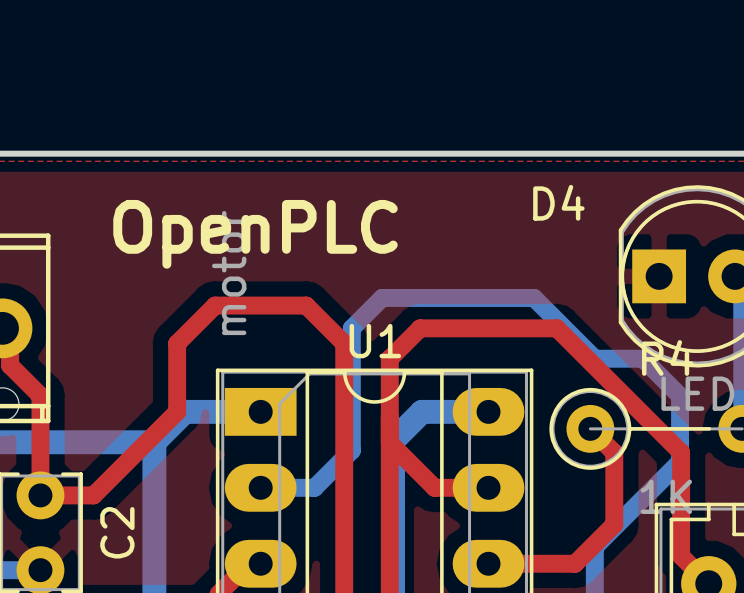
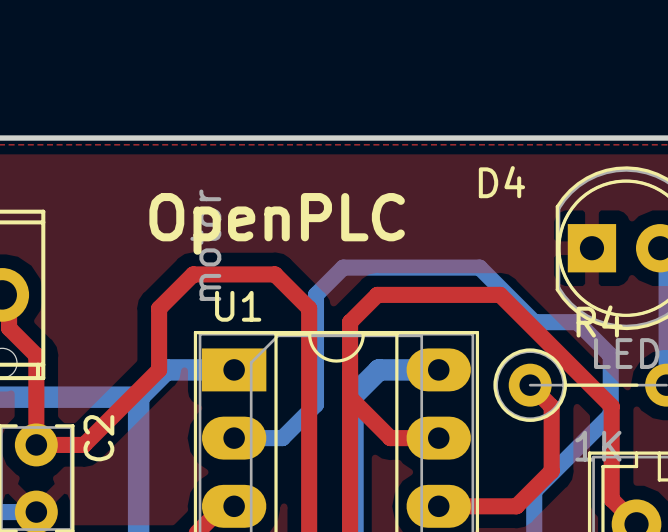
text position: OpenPLC (255, 234) -> OpenPLC (277, 223)
U1 name position: U1 (375, 341) -> U1 (238, 306)
C2 name position: C2 (117, 532) -> C2 (98, 438)

